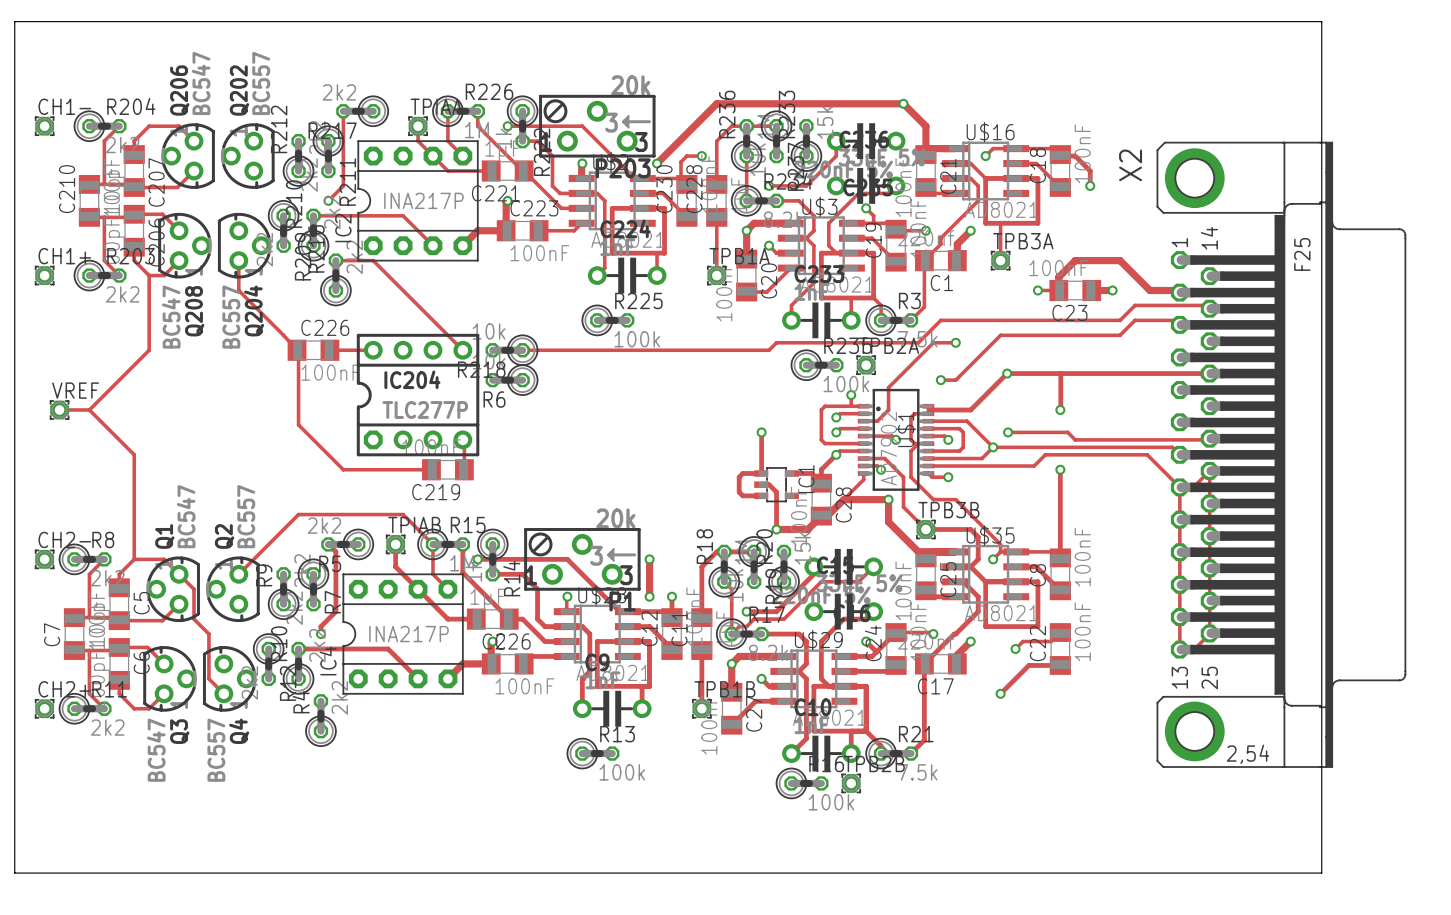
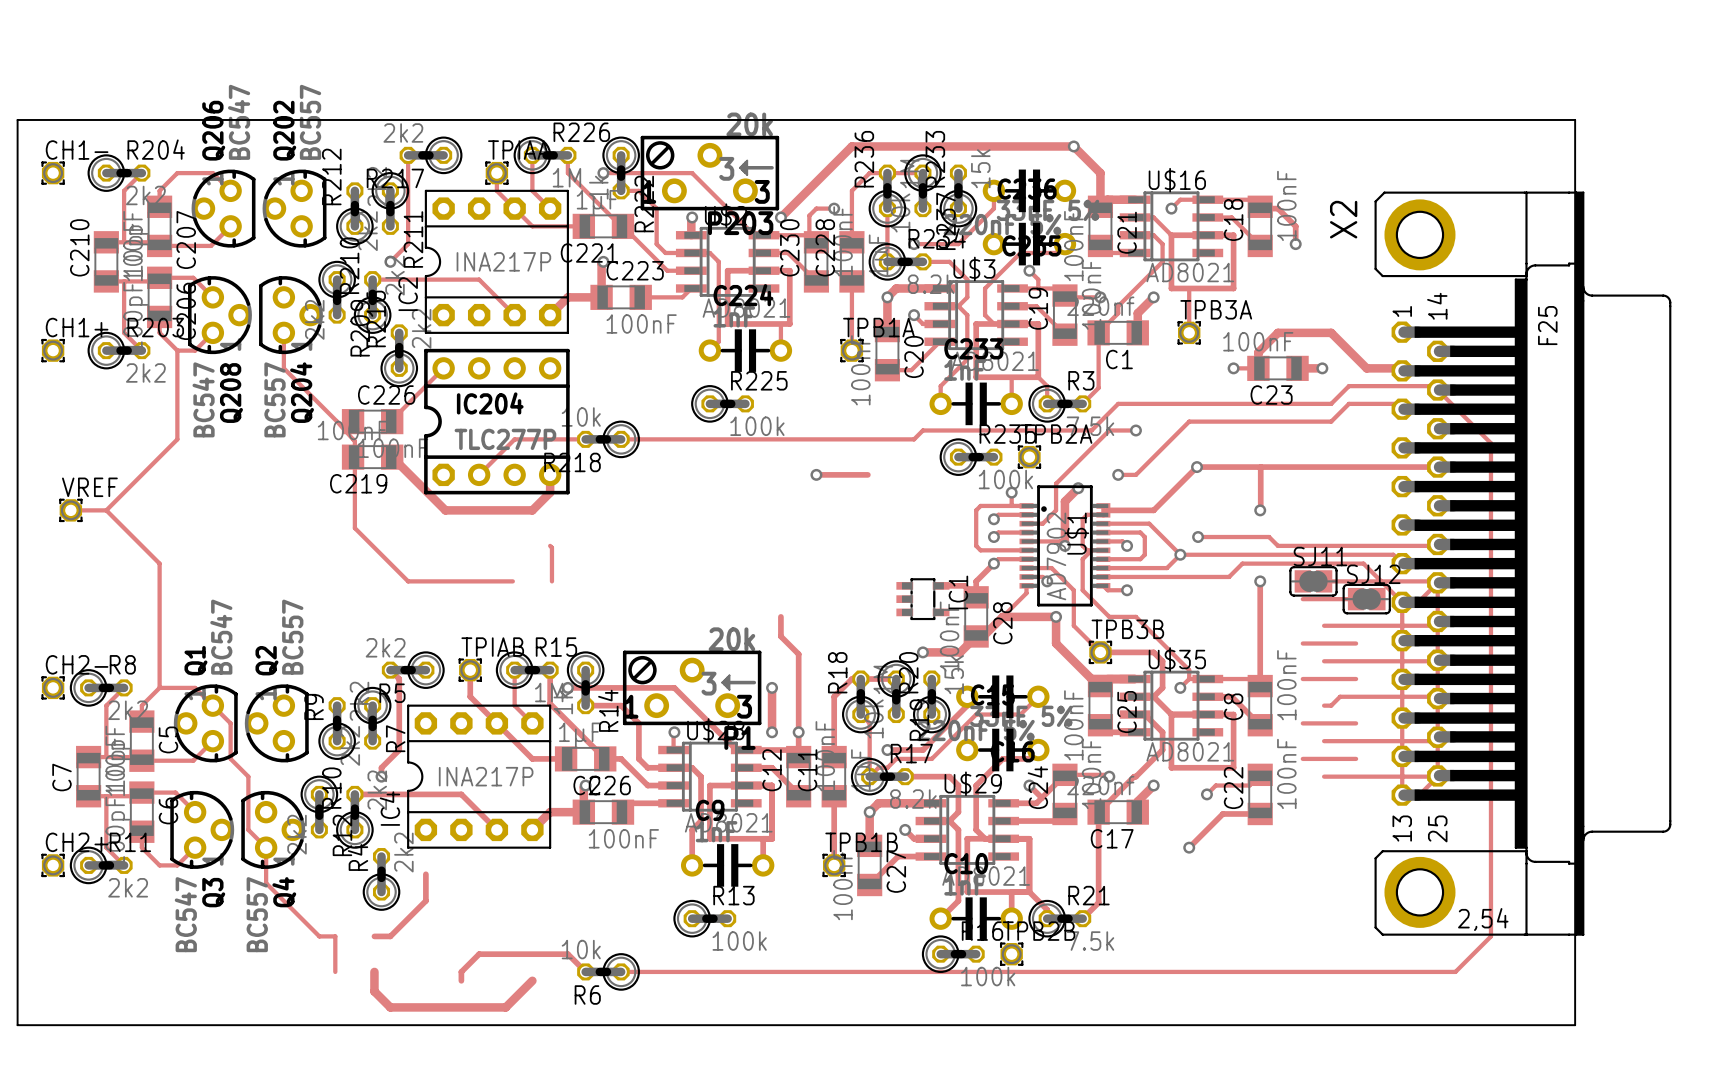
board edge: (14, 81) (14, 21) (1321, 21) (1321, 873) (14, 873) (14, 843) -> (17, 119) (1575, 119) (1575, 1025) (17, 1025)
track: (335, 260) (373, 260) (462, 350) -> none
track: none -> (443, 368) (392, 421)
track: none -> (1437, 390) (1490, 443) (1490, 936) (1455, 971) (621, 971)
C226 position: (313, 350) -> (372, 421)
track: (329, 350) (373, 350) -> none
track: none -> (603, 439) (514, 439) (479, 474)
track: none -> (392, 457) (445, 510) (532, 510) (550, 492) (550, 474)
R6 position: (512, 380) -> (608, 971)
track: none -> (816, 474) (867, 474)
via: none -> (816, 474)
track: none -> (1078, 488) (1064, 501) (1064, 545)
via: none -> (1078, 488)
IC204 position: (418, 395) -> (496, 421)
track: (761, 432) (761, 473) (742, 473) (739, 477) (739, 492) (742, 495) (761, 495) -> none
via: (761, 432) -> none
C219 position: (447, 469) -> (372, 457)
SJ11: none -> (1313, 581)
track: none -> (1324, 581) (1437, 582)
track: (761, 484) (769, 484) (776, 492) (776, 529) -> none
track: none -> (1302, 599) (1356, 599)
SJ12: none -> (1366, 599)
track: none -> (780, 616) (780, 636) (798, 654) (798, 732)
track: none -> (1437, 621) (1433, 625) (1324, 625)
track: none -> (1302, 643) (1356, 643)
track: none -> (1437, 660) (1324, 661)
track: (432, 544) (403, 514) (298, 514) (238, 574) -> none
track: none -> (1302, 679) (1356, 679)
track: none -> (1437, 698) (1435, 696) (1340, 696) (1331, 705) (1324, 705)
track: none -> (1302, 723) (1356, 723)
track: none -> (1437, 737) (1433, 741) (1324, 741)
track: none -> (1302, 758) (1356, 758)
track: none -> (1437, 775) (1324, 776)
track: none -> (266, 847) (266, 883) (319, 936) (335, 936) (335, 971)
track: none -> (425, 874) (425, 900) (390, 936) (374, 936)
track: none -> (374, 971) (374, 991) (390, 1007) (505, 1007) (532, 980)
track: none -> (585, 971) (567, 954) (479, 954) (461, 971) (461, 980)

